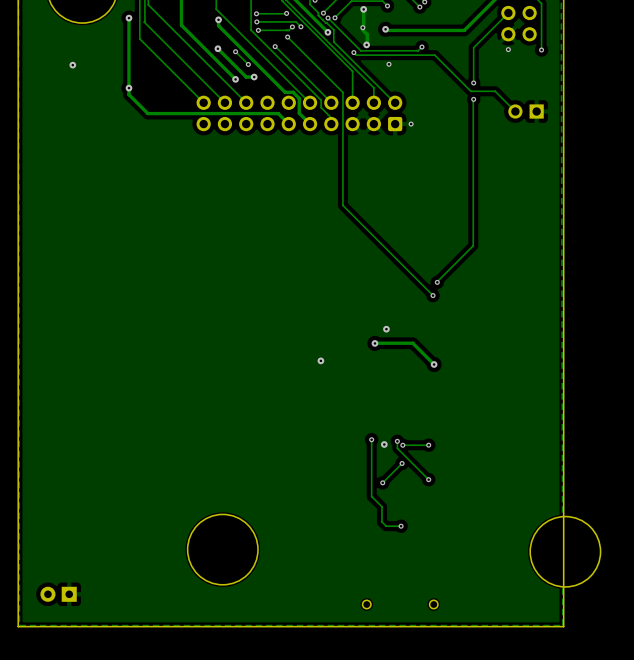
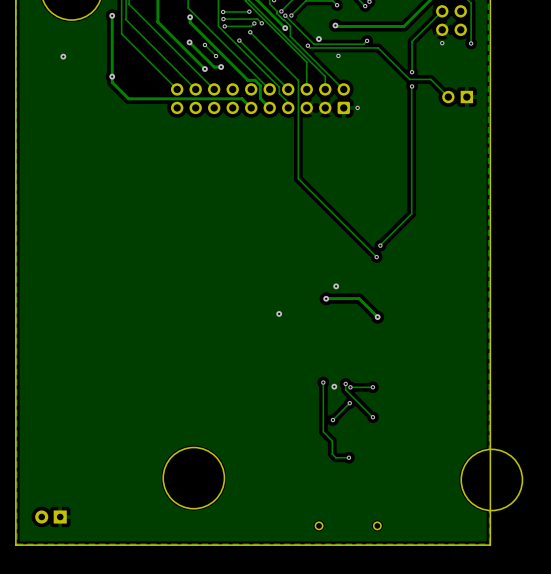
track: (363, 9) (362, 27) (367, 34) (366, 44) -> none
via: (363, 9) -> none
via: (362, 27) -> none

